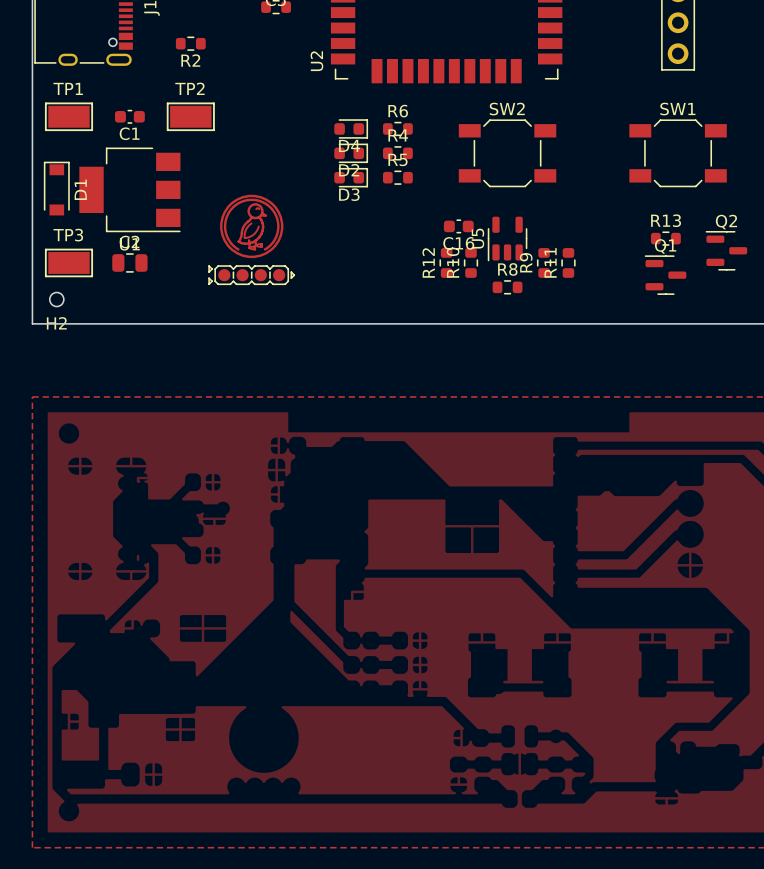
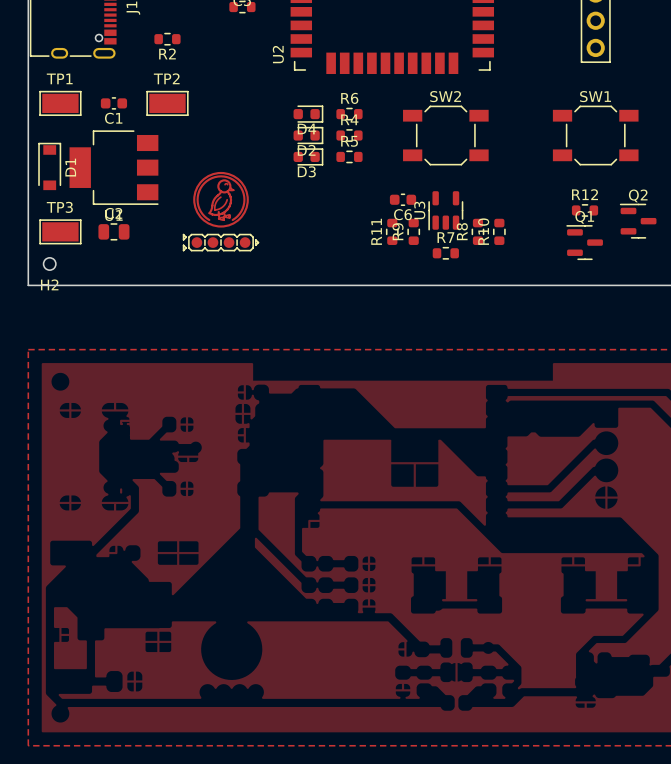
R13 name: R13 (666, 220) -> R12 (585, 194)
U5 name: U5 (477, 238) -> U3 (419, 210)
C16 name: C16 (458, 243) -> C6 (402, 214)
R12 name: R12 (428, 262) -> R11 (376, 231)
R10 name: R10 (453, 262) -> R9 (398, 231)
R9 name: R9 (526, 262) -> R8 (462, 231)
R11 name: R11 (550, 262) -> R10 (483, 231)
R8 name: R8 (507, 269) -> R7 (445, 237)

